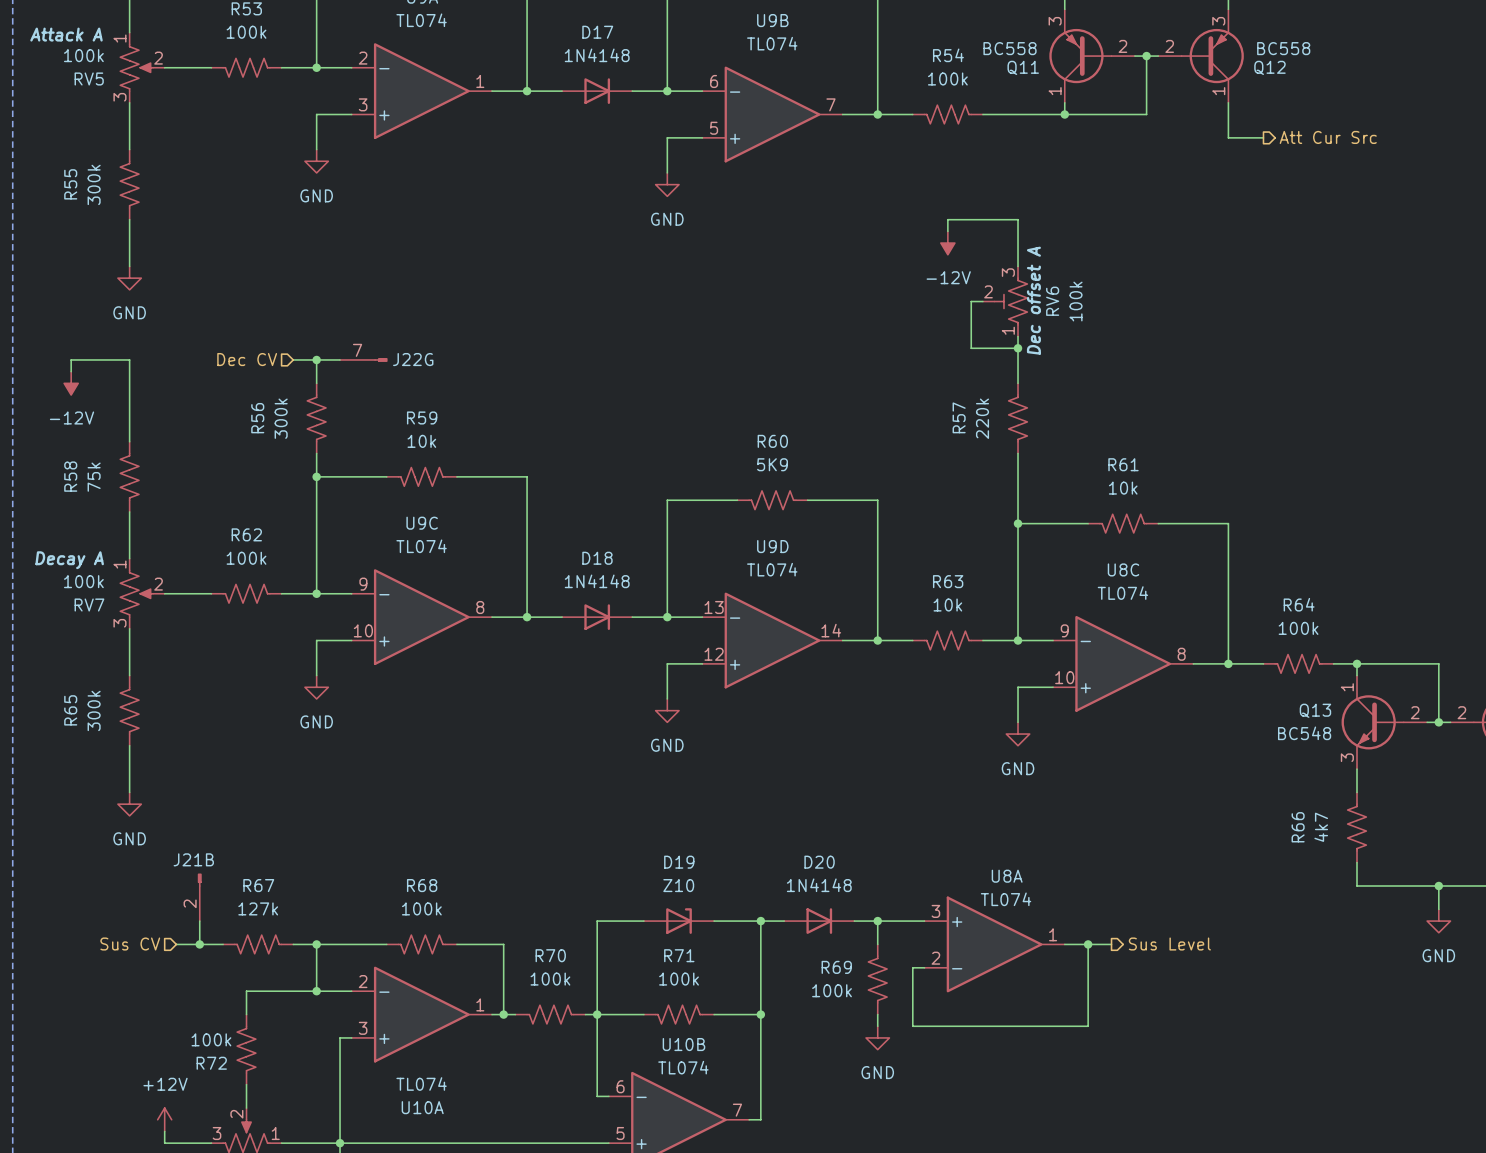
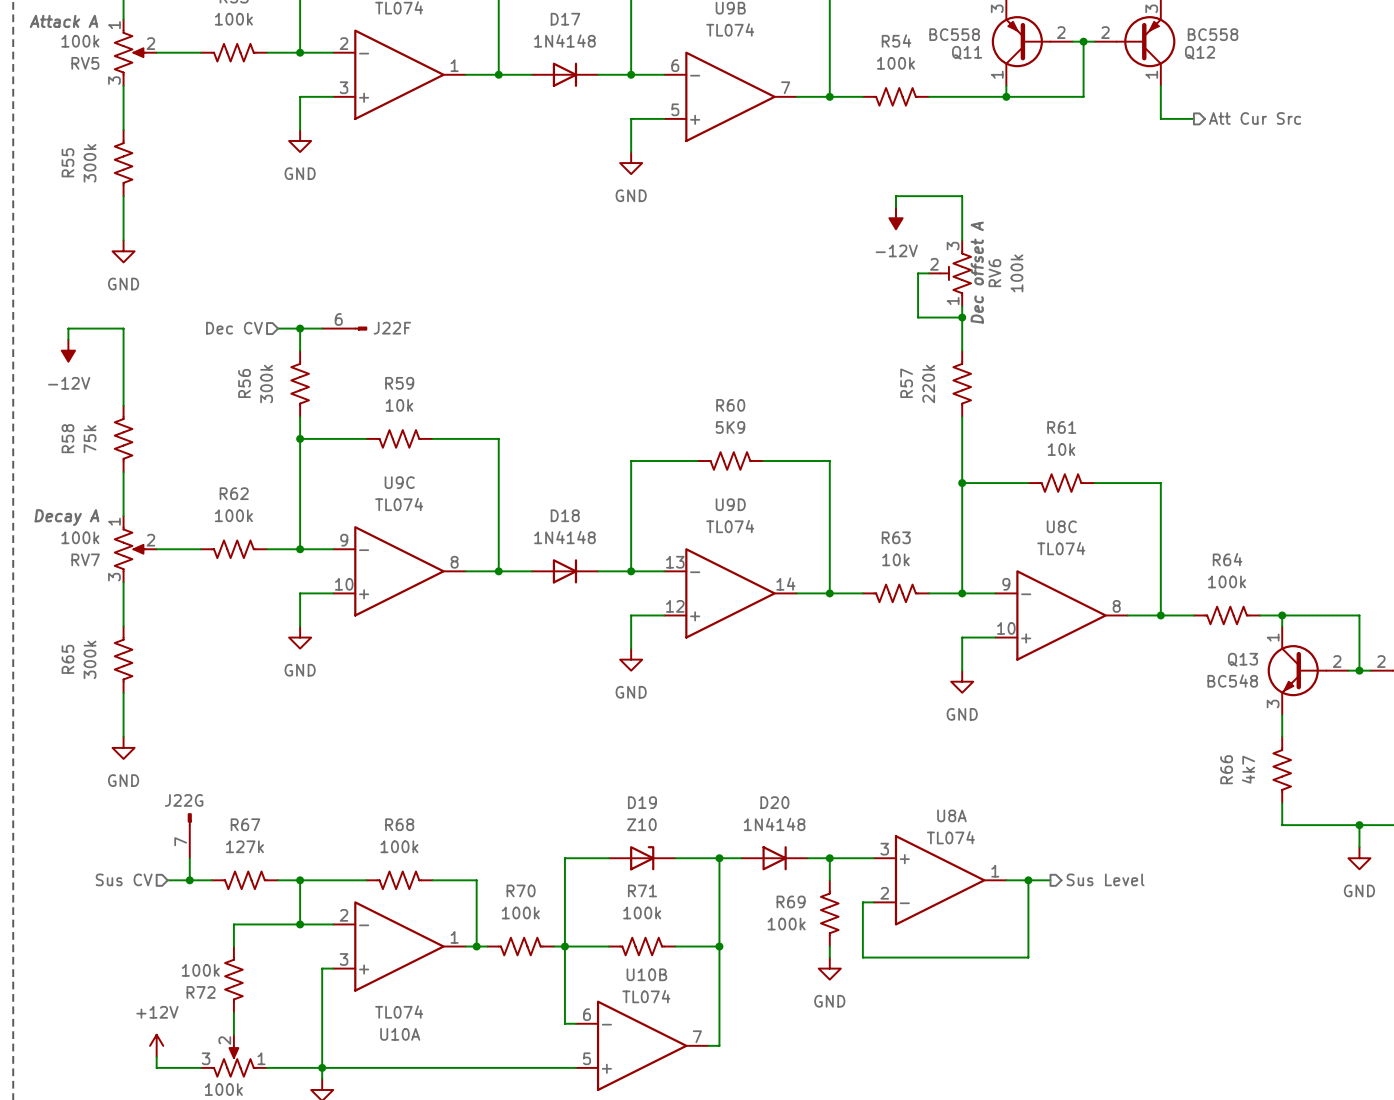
J22G position: (363, 359) -> (189, 835)
J22F: none -> (344, 328)
J22G rotation: 0° (380, 359) -> 90° counterclockwise (189, 819)
J21B: (199, 897) -> none

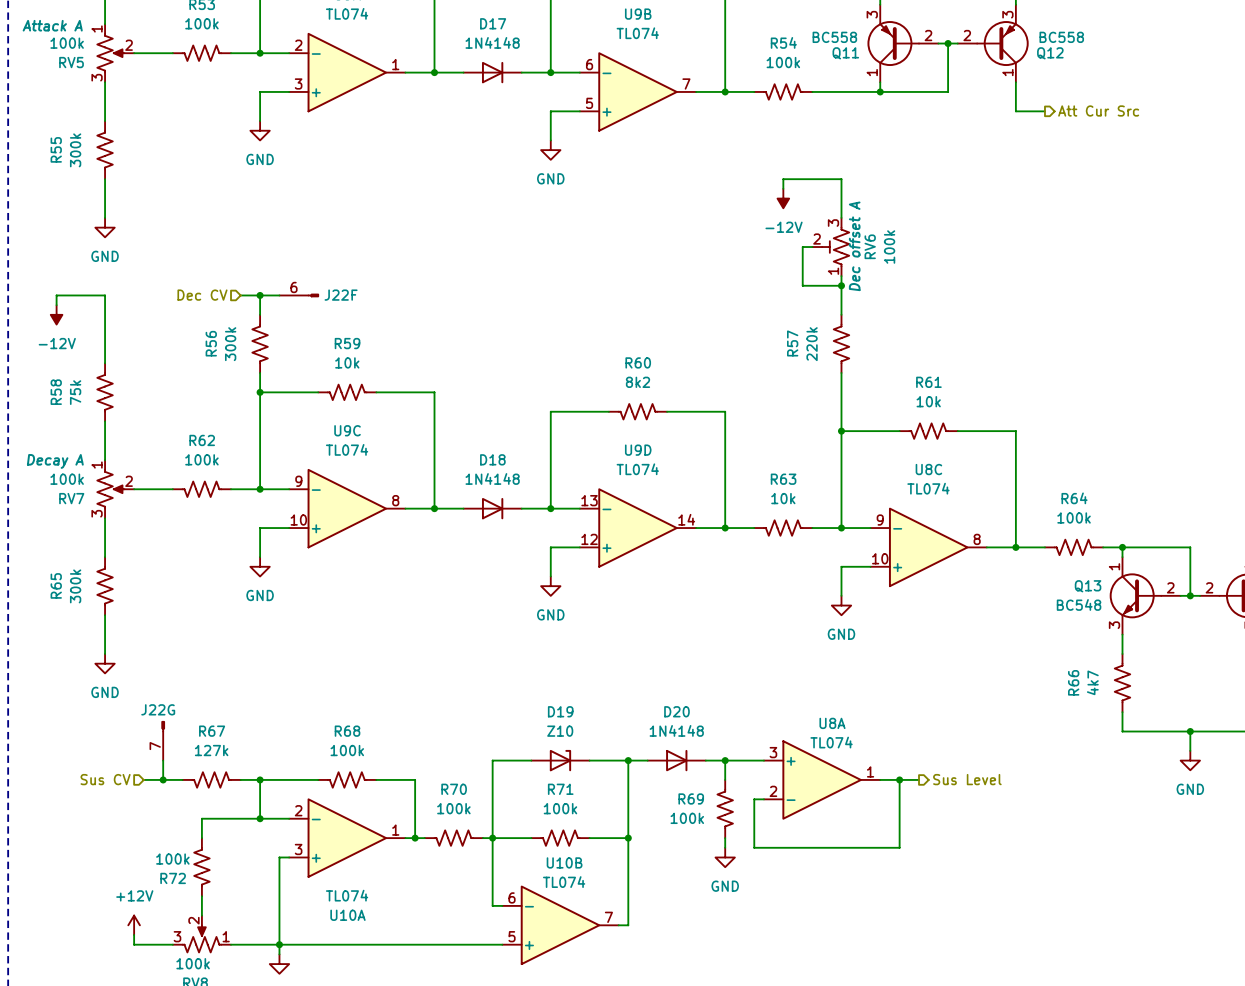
R60 value: 5K9 (730, 427) -> 8k2 (637, 382)

